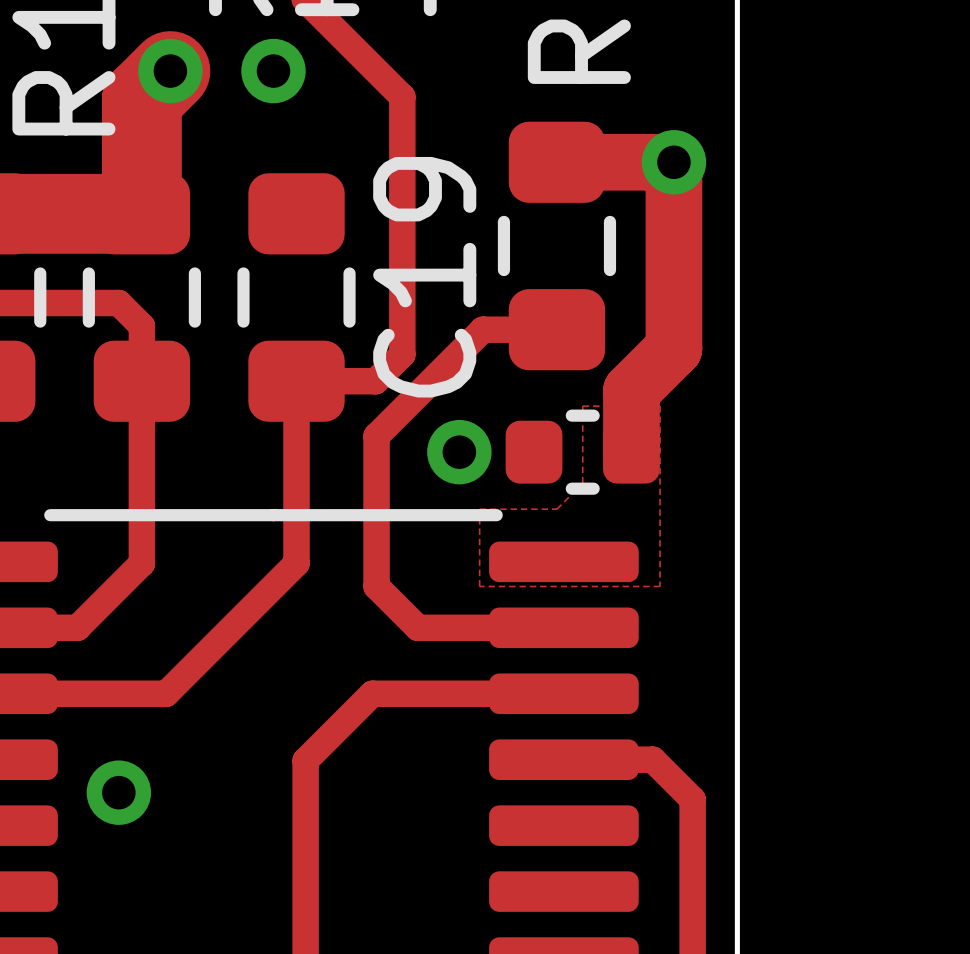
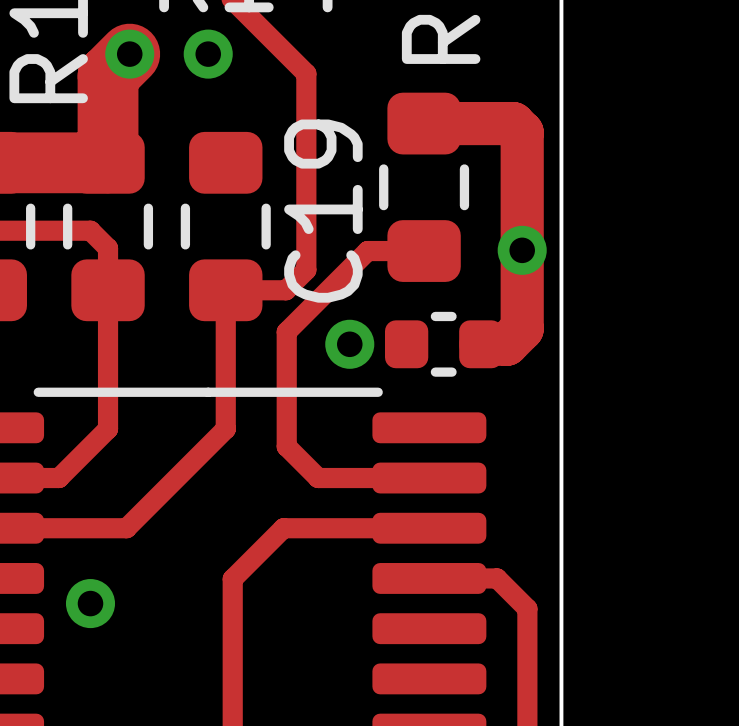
track: (673, 162) (673, 348) (631, 390) (631, 452) -> (513, 123) (522, 132) (522, 328) (506, 344) (480, 344)
via position: (673, 162) -> (522, 250)
zone outline: (582, 406) (582, 483) (556, 509) (479, 509) (479, 586) (660, 586) (660, 406) (582, 406) -> none

